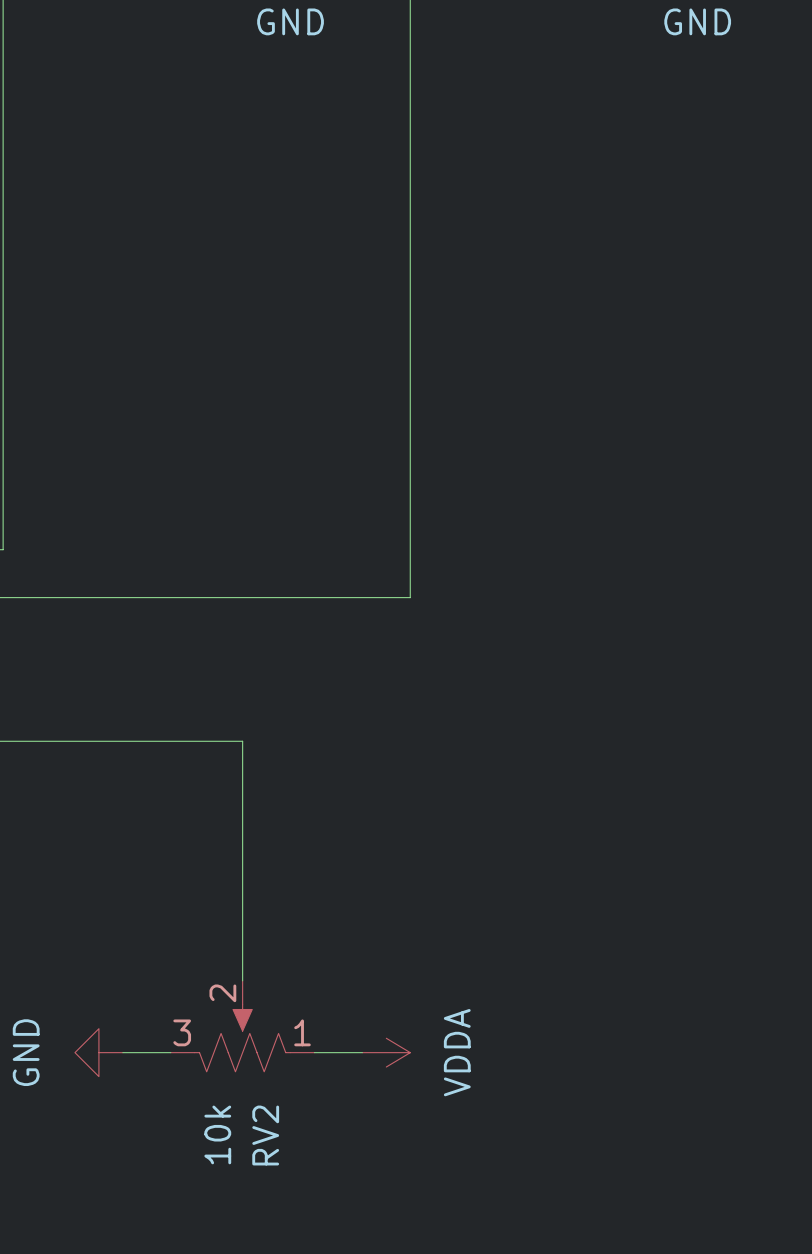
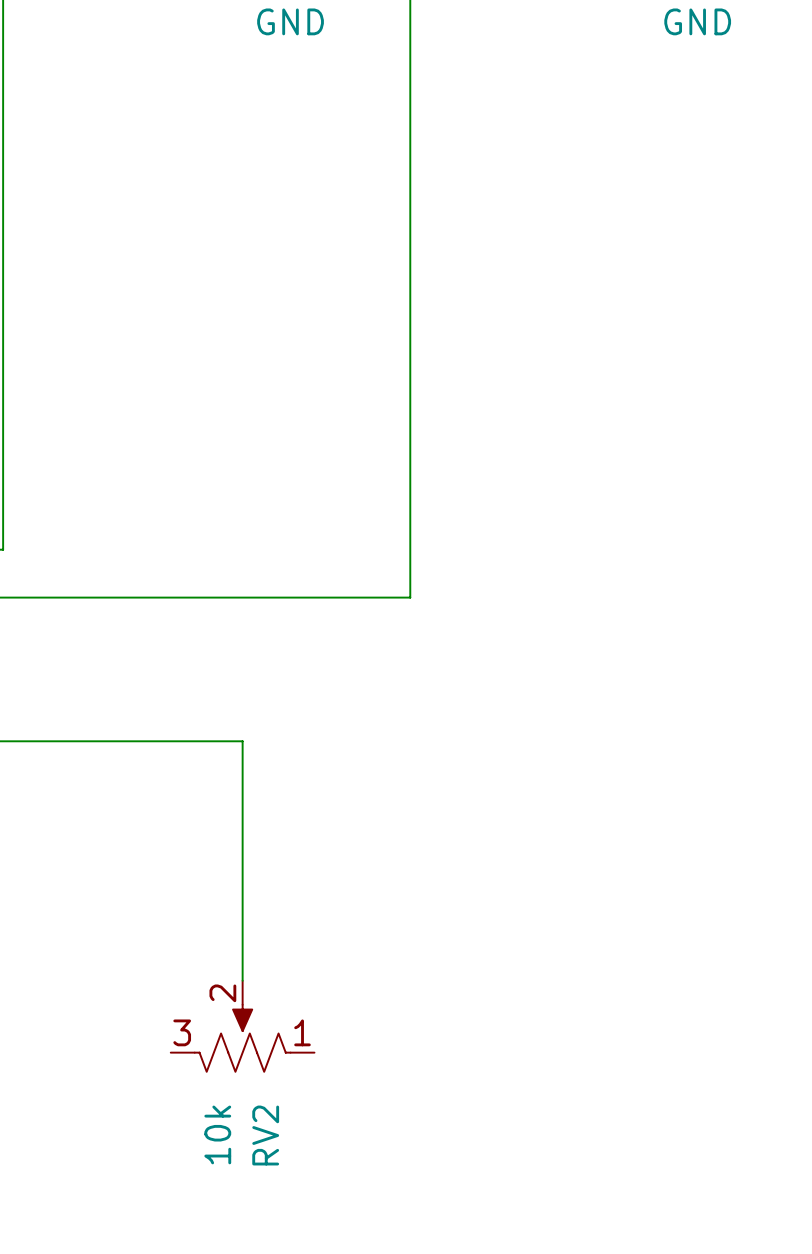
power symbol: GND (98, 1052) -> none
wire: (122, 1052) (170, 1052) -> none
wire: (314, 1052) (362, 1052) -> none
power symbol: VDDA (386, 1052) -> none

